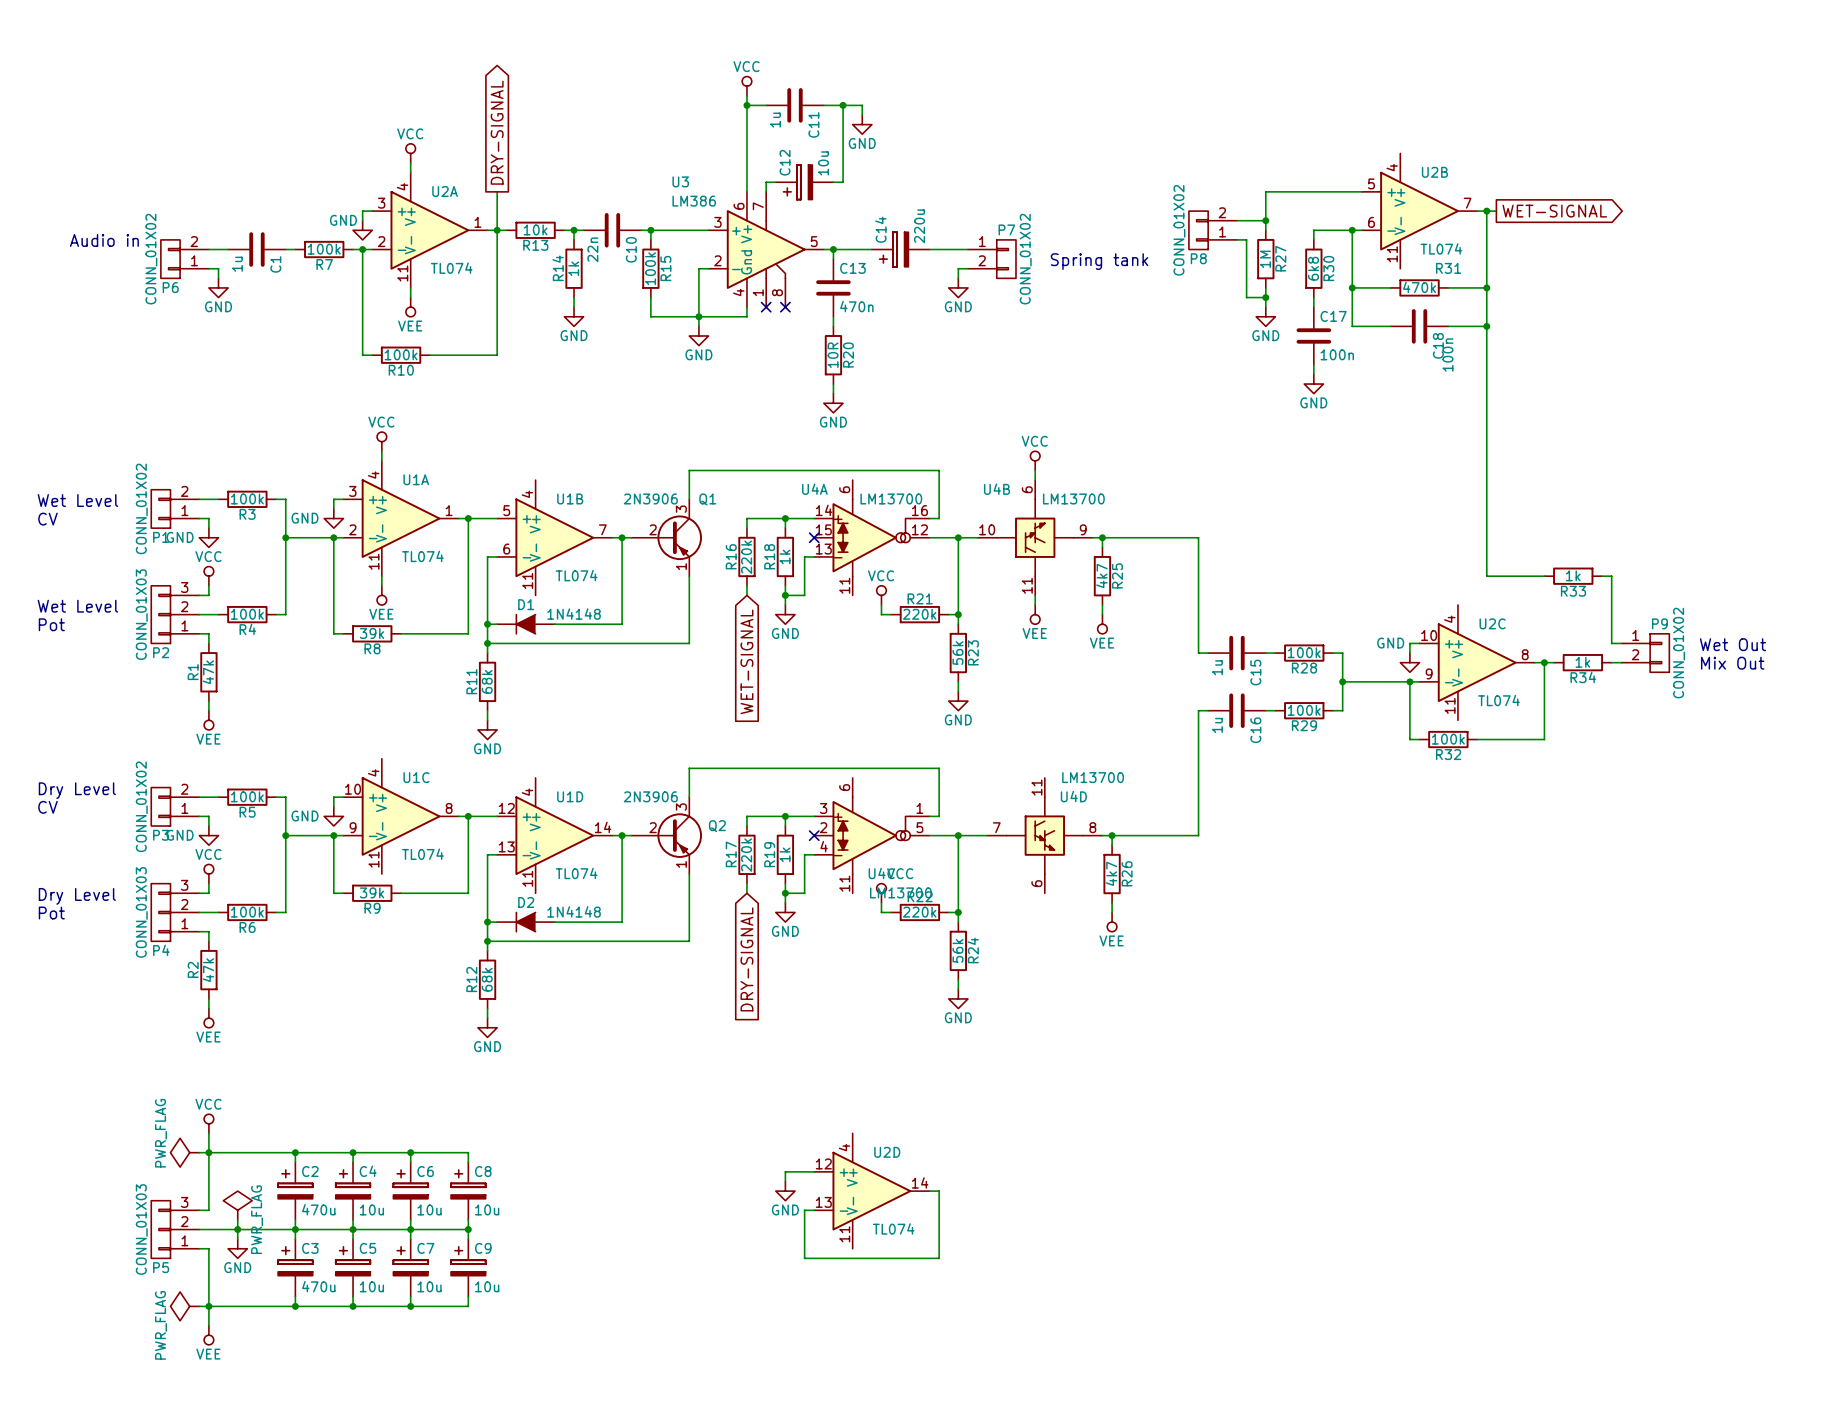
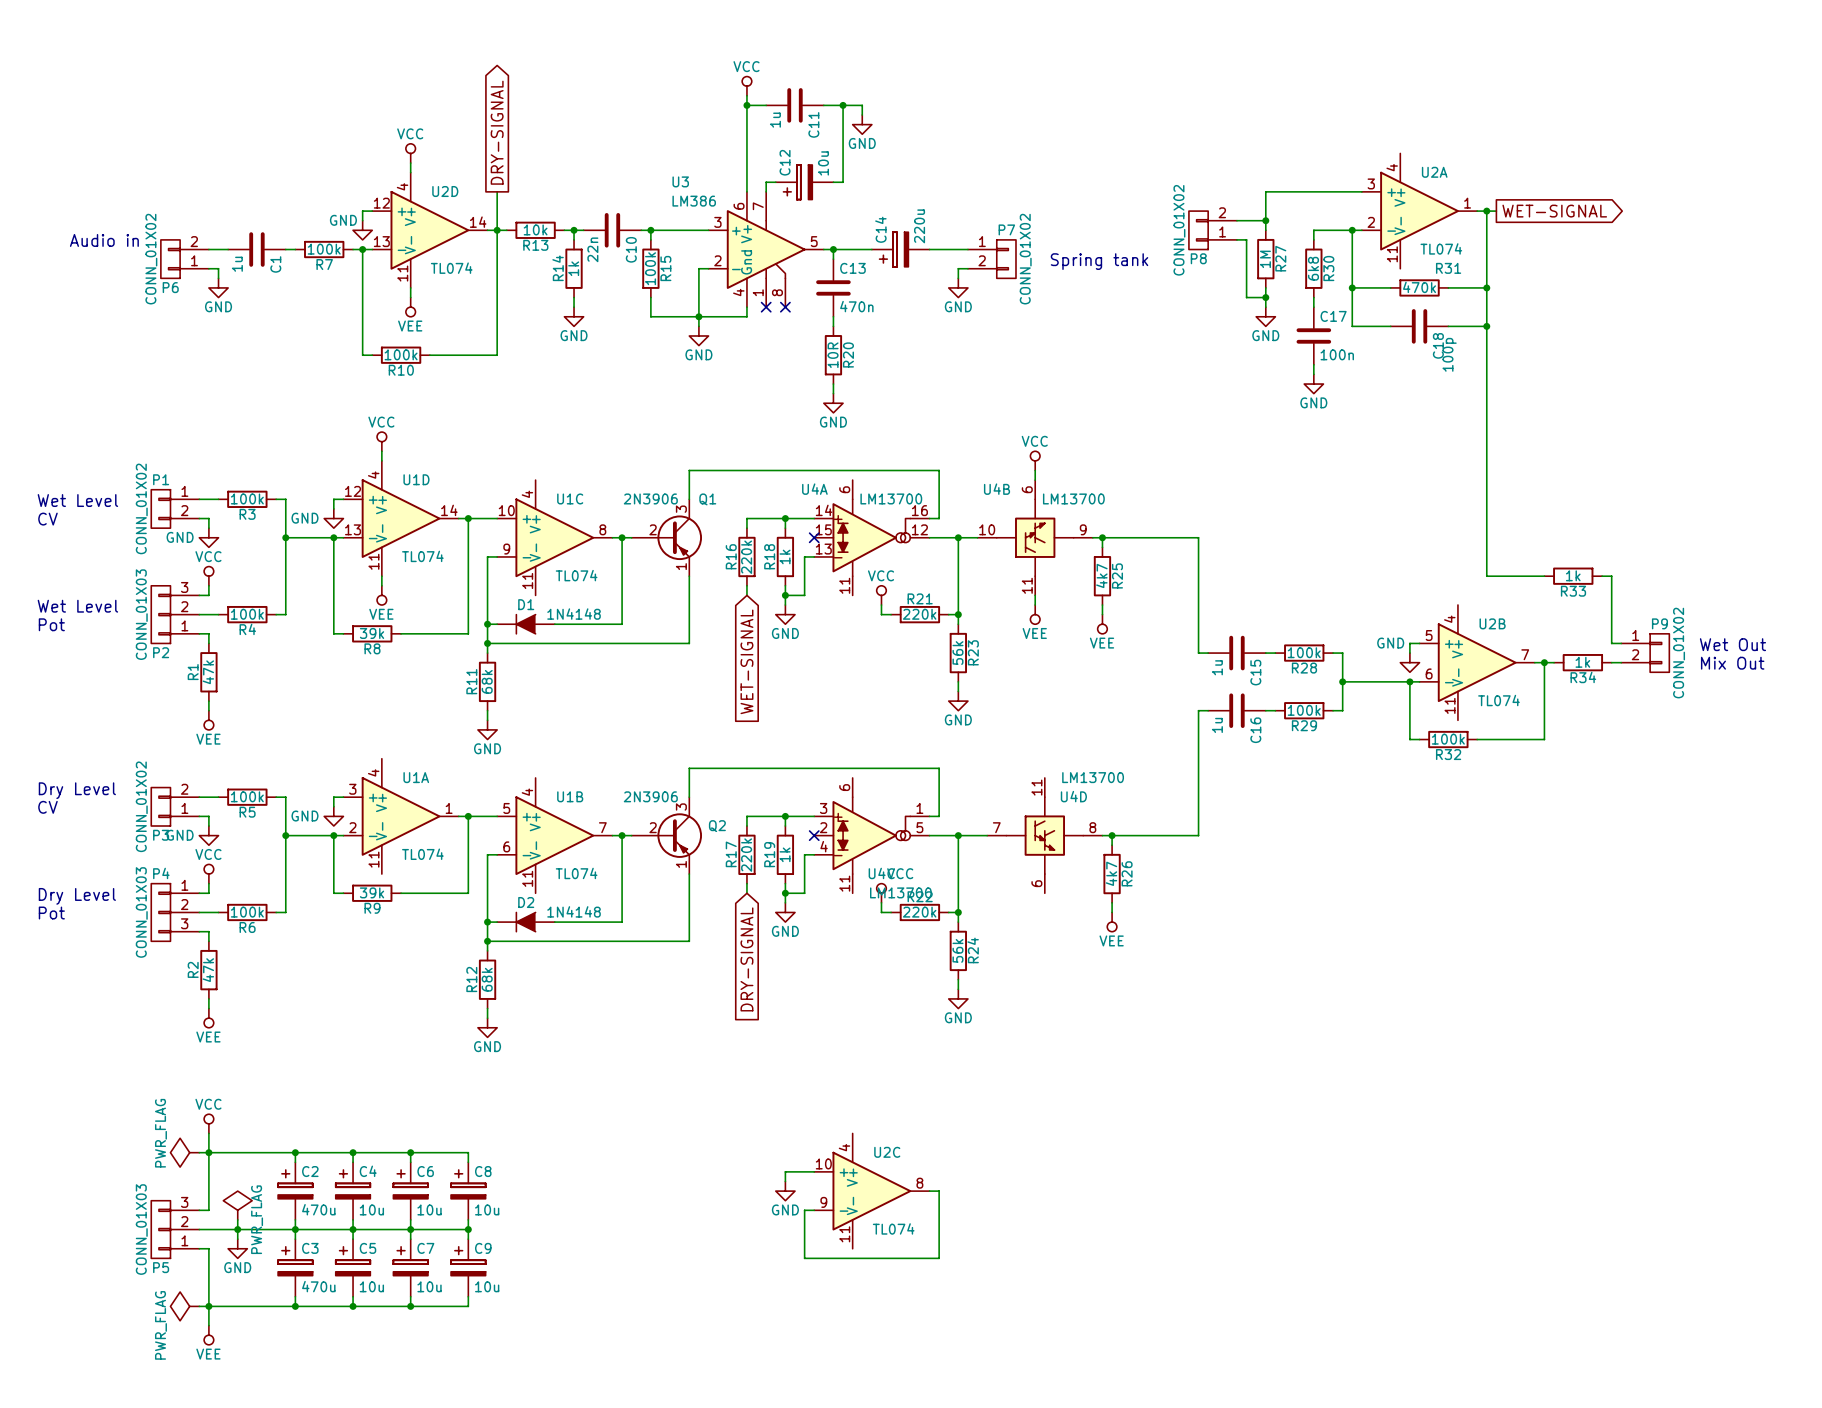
U2B position: (1419, 211) -> (1477, 662)
U2A position: (429, 230) -> (1419, 211)
C18 value: 100n (1447, 355) -> 100p (1449, 354)
P1 flip: as is (160, 508) -> up-down (160, 508)
U1A position: (401, 518) -> (401, 816)
U1B position: (554, 537) -> (554, 835)
U2C position: (1477, 662) -> (871, 1191)
U1C position: (401, 816) -> (554, 537)
U1D position: (554, 835) -> (401, 518)
P4 flip: as is (160, 912) -> up-down (160, 912)
U2D position: (871, 1191) -> (429, 230)

